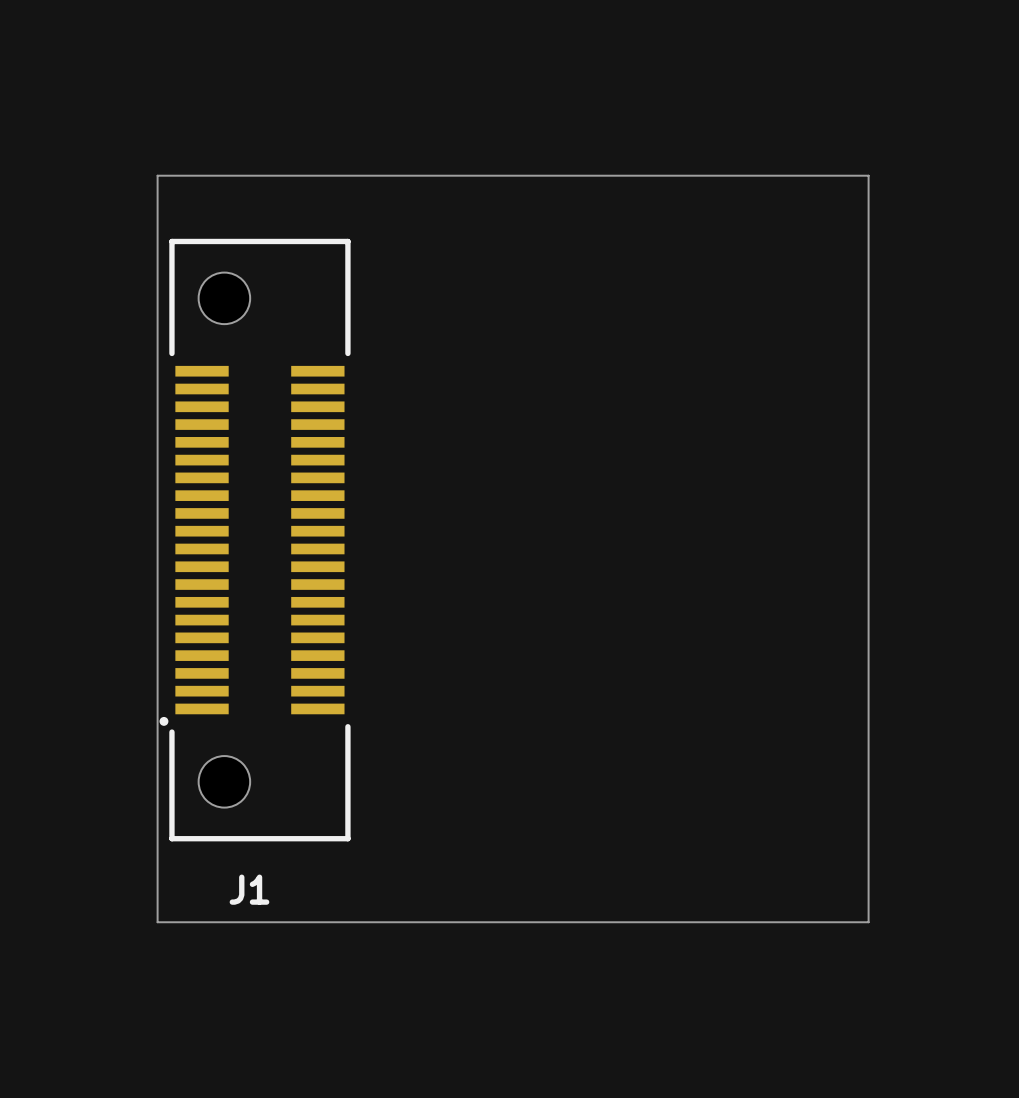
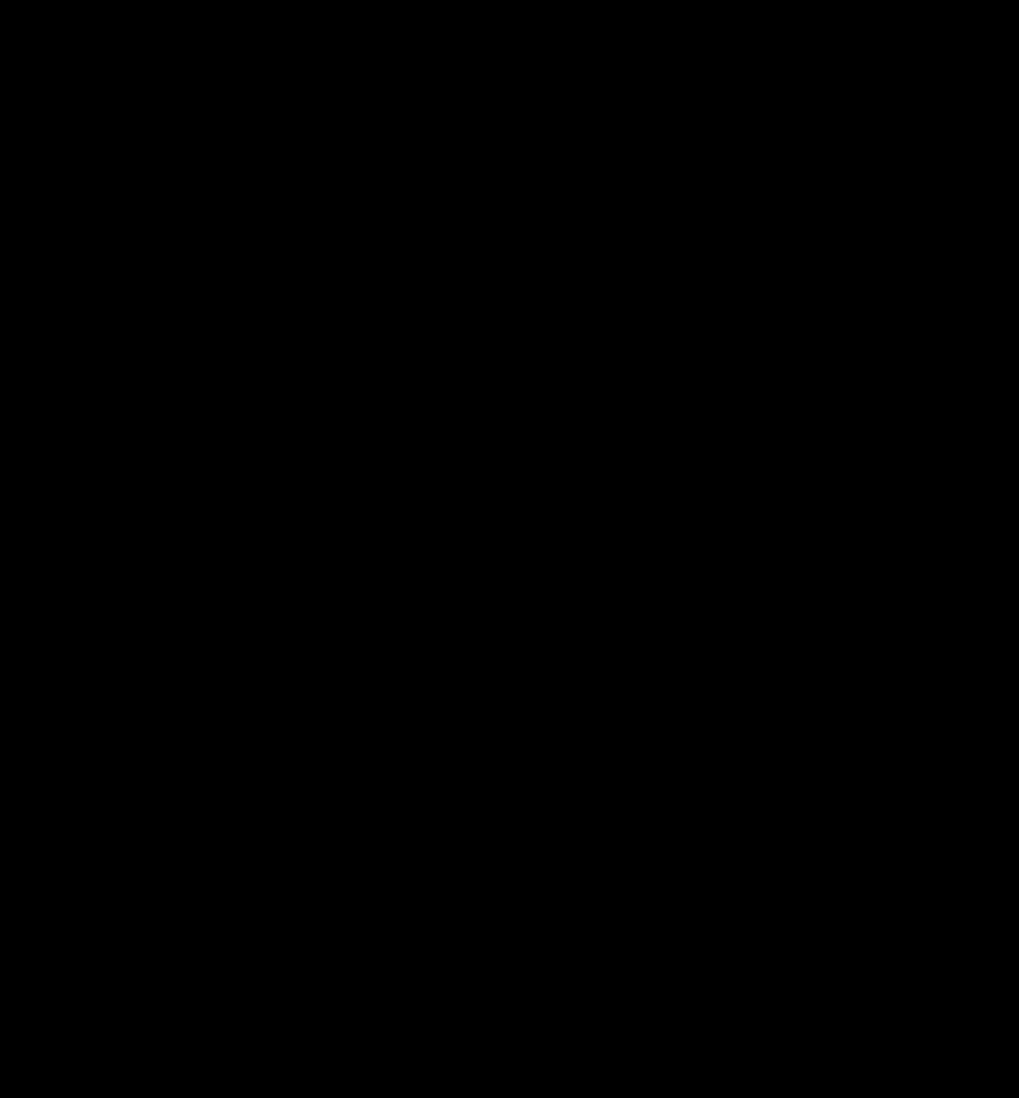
board edge: (868, 175) (157, 175) (157, 922) (868, 922) (868, 175) -> none
J1: (255, 540) -> none

